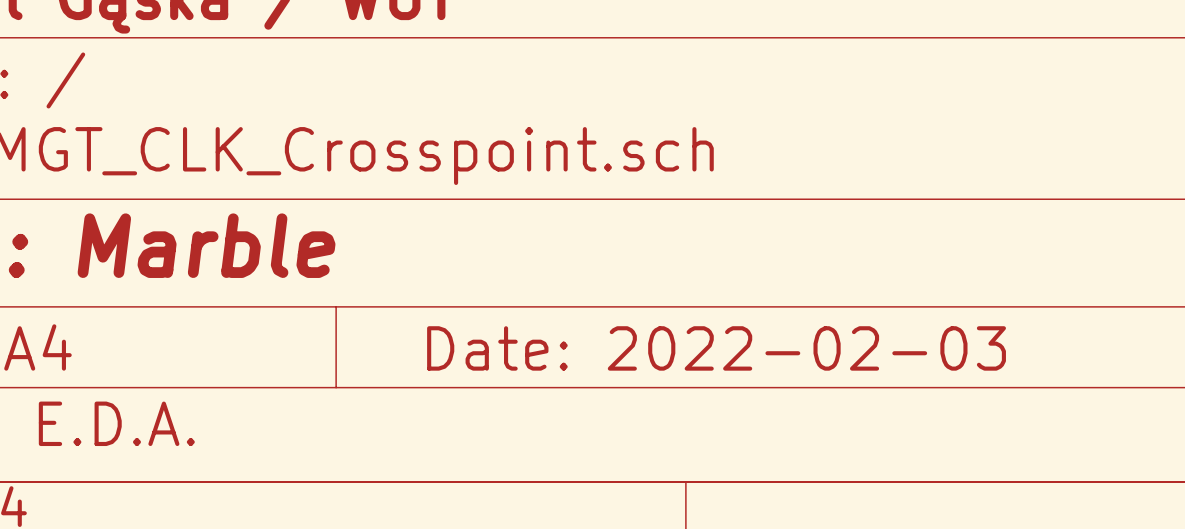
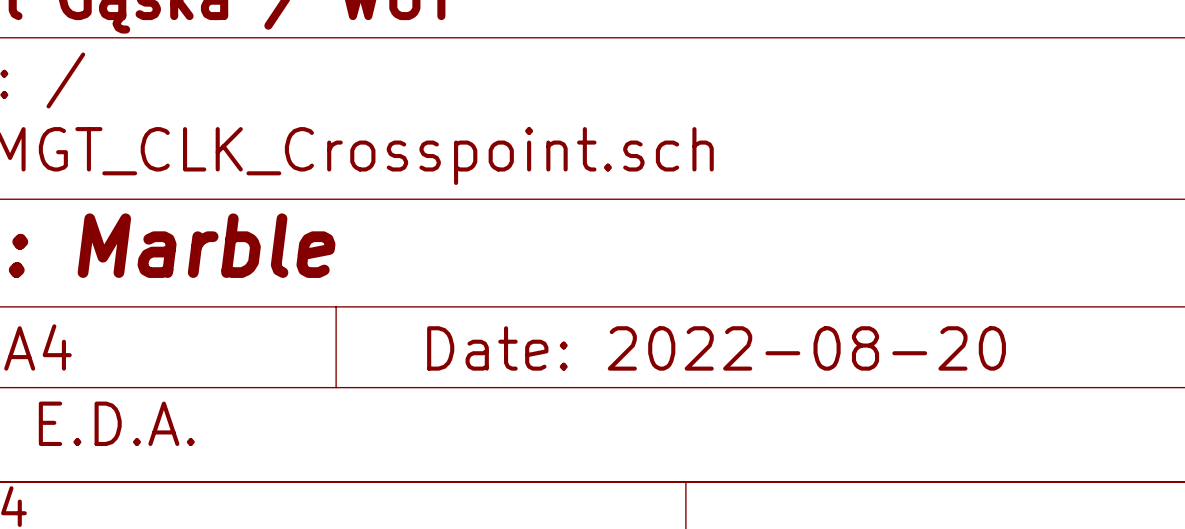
title block: Date: 2022-02-03 (716, 348) -> Date: 2022-08-20 (716, 348)

